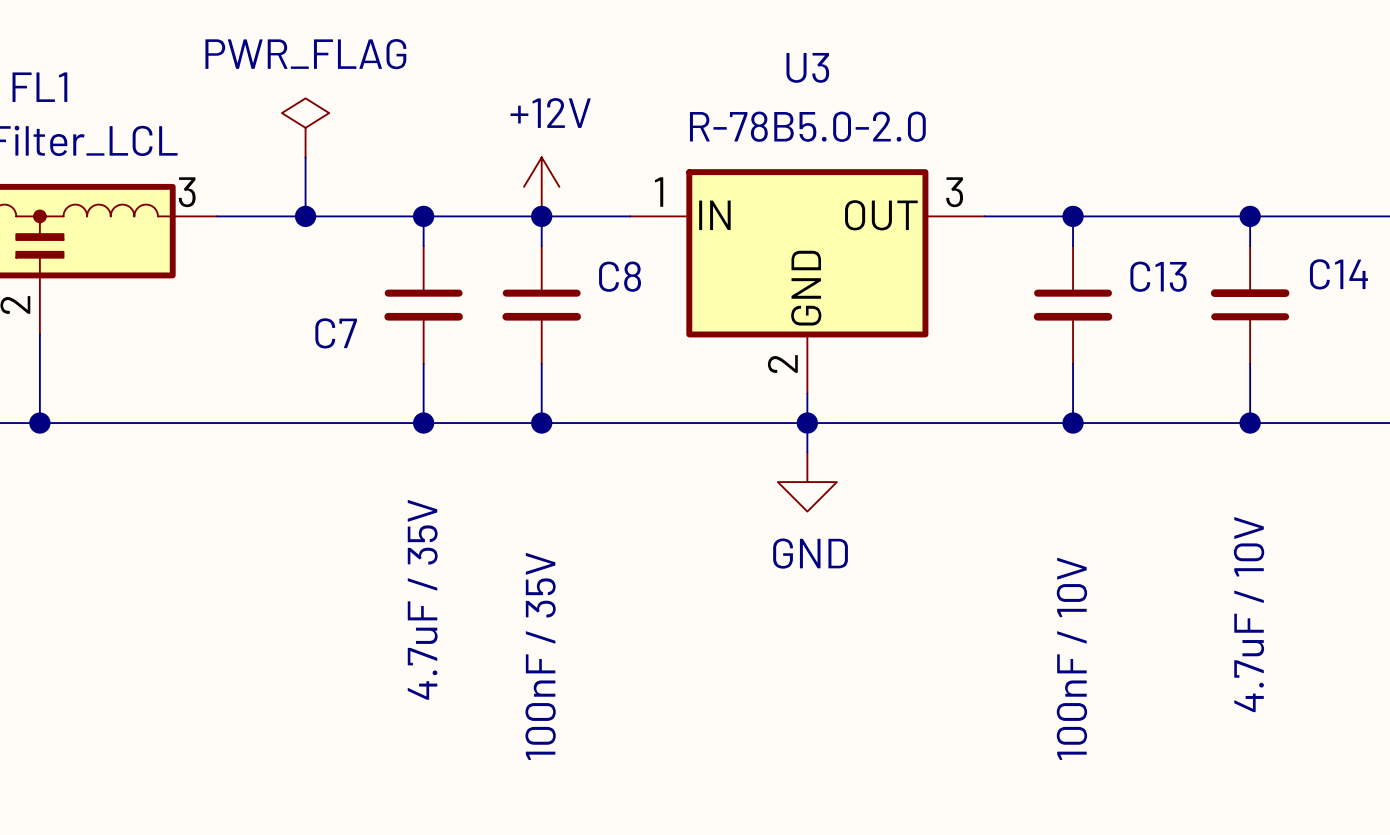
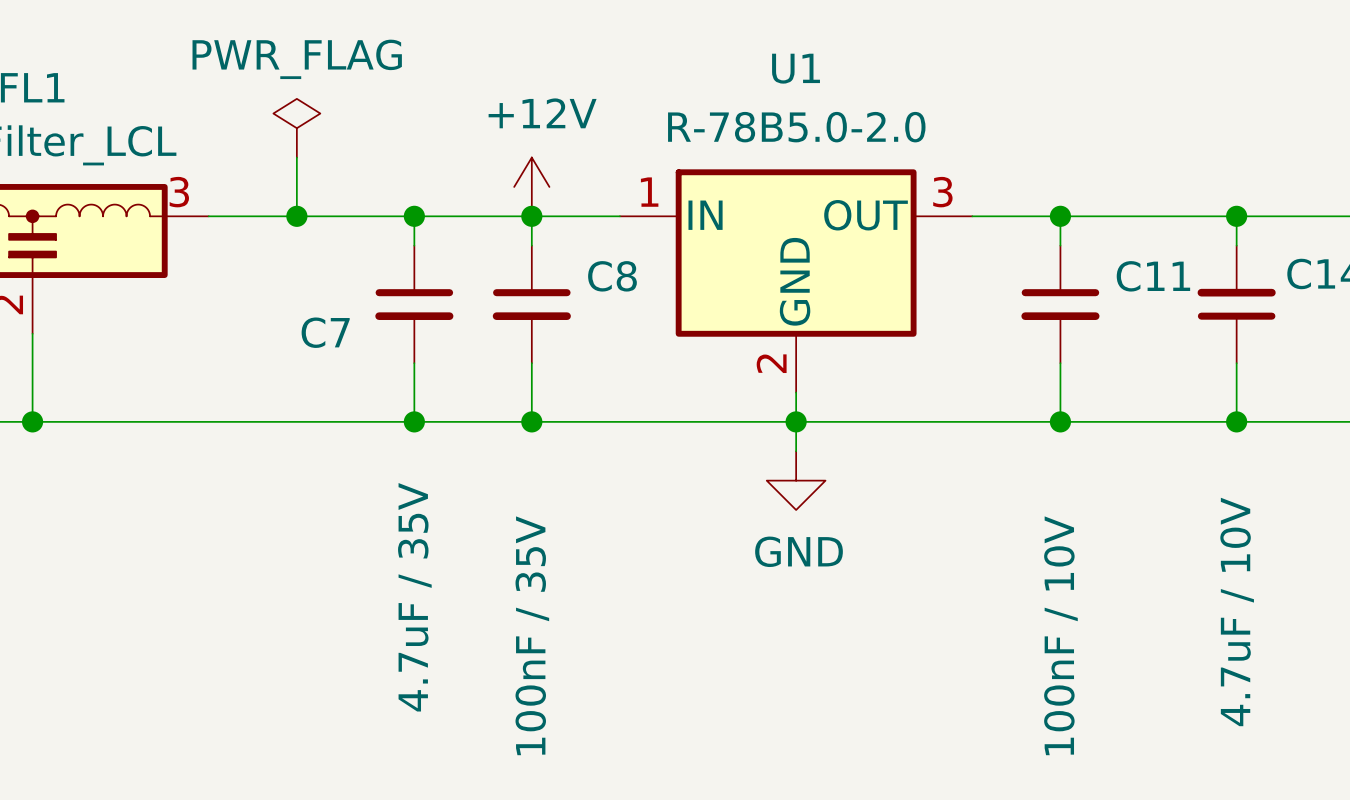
U3 name: U3 (807, 67) -> U1 (796, 68)
C13 name: C13 (1158, 276) -> C11 (1153, 276)

